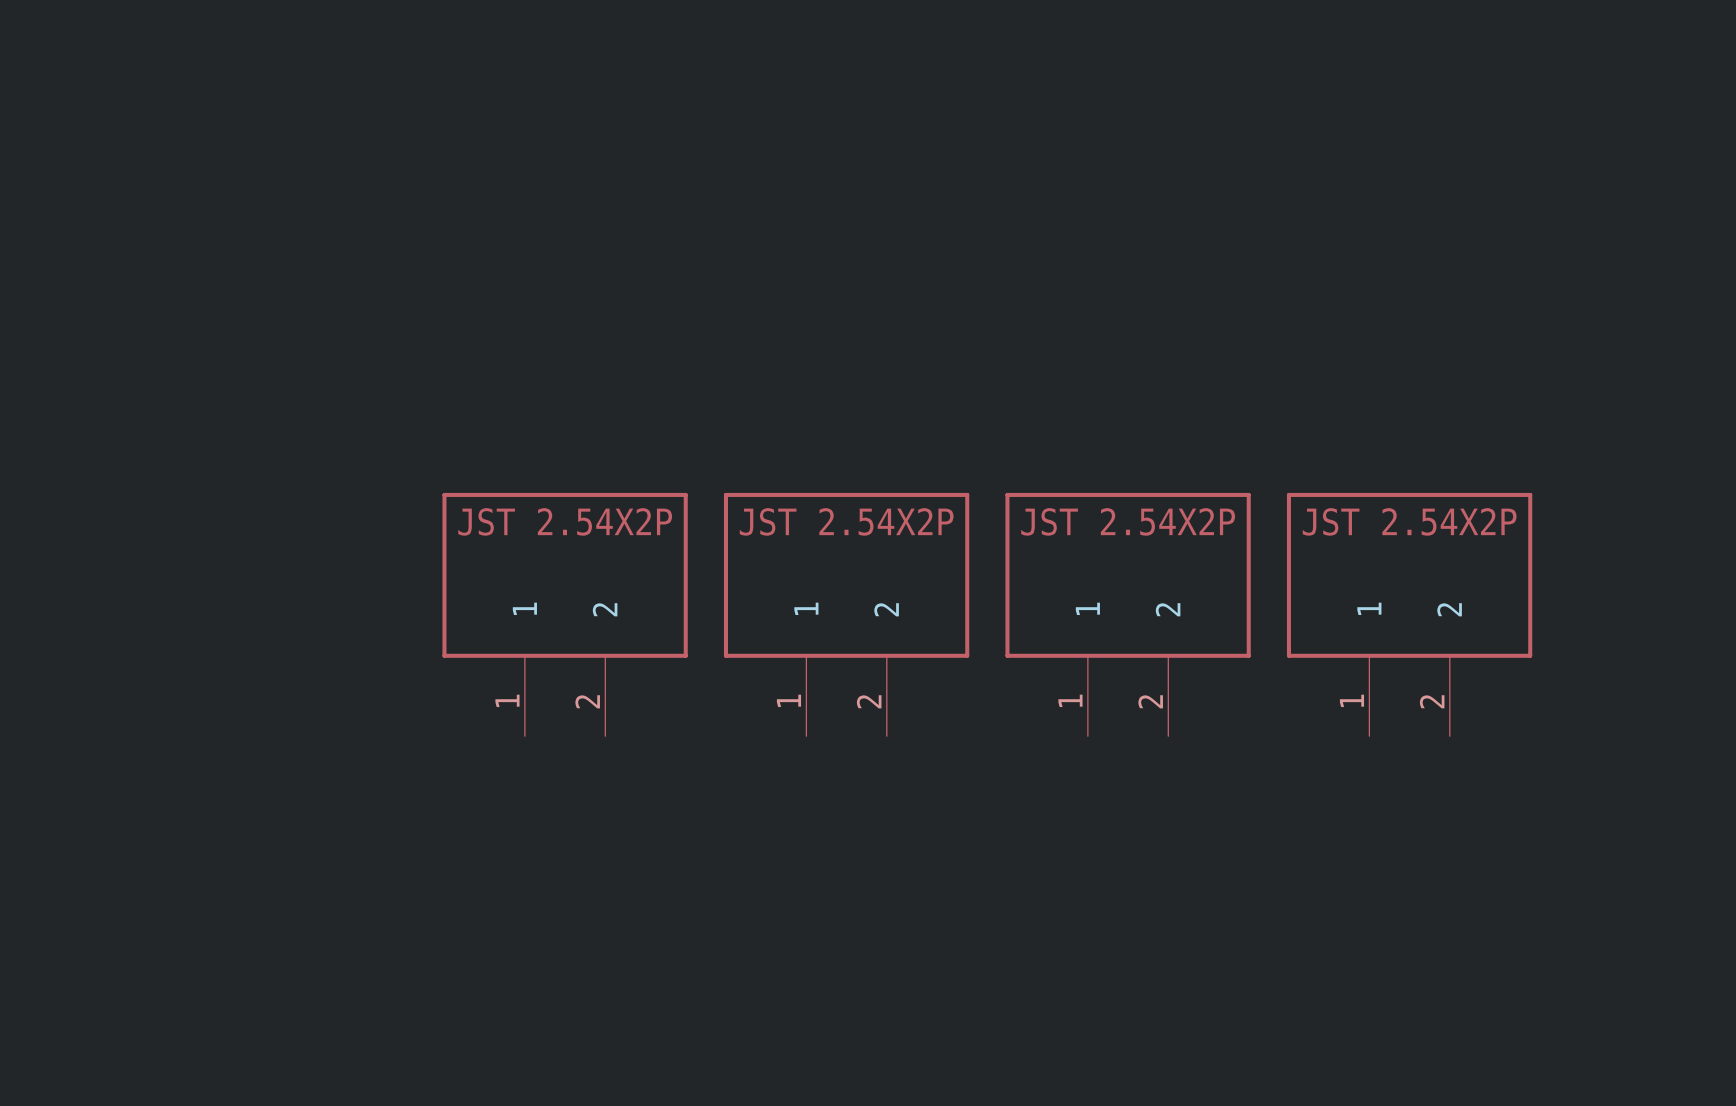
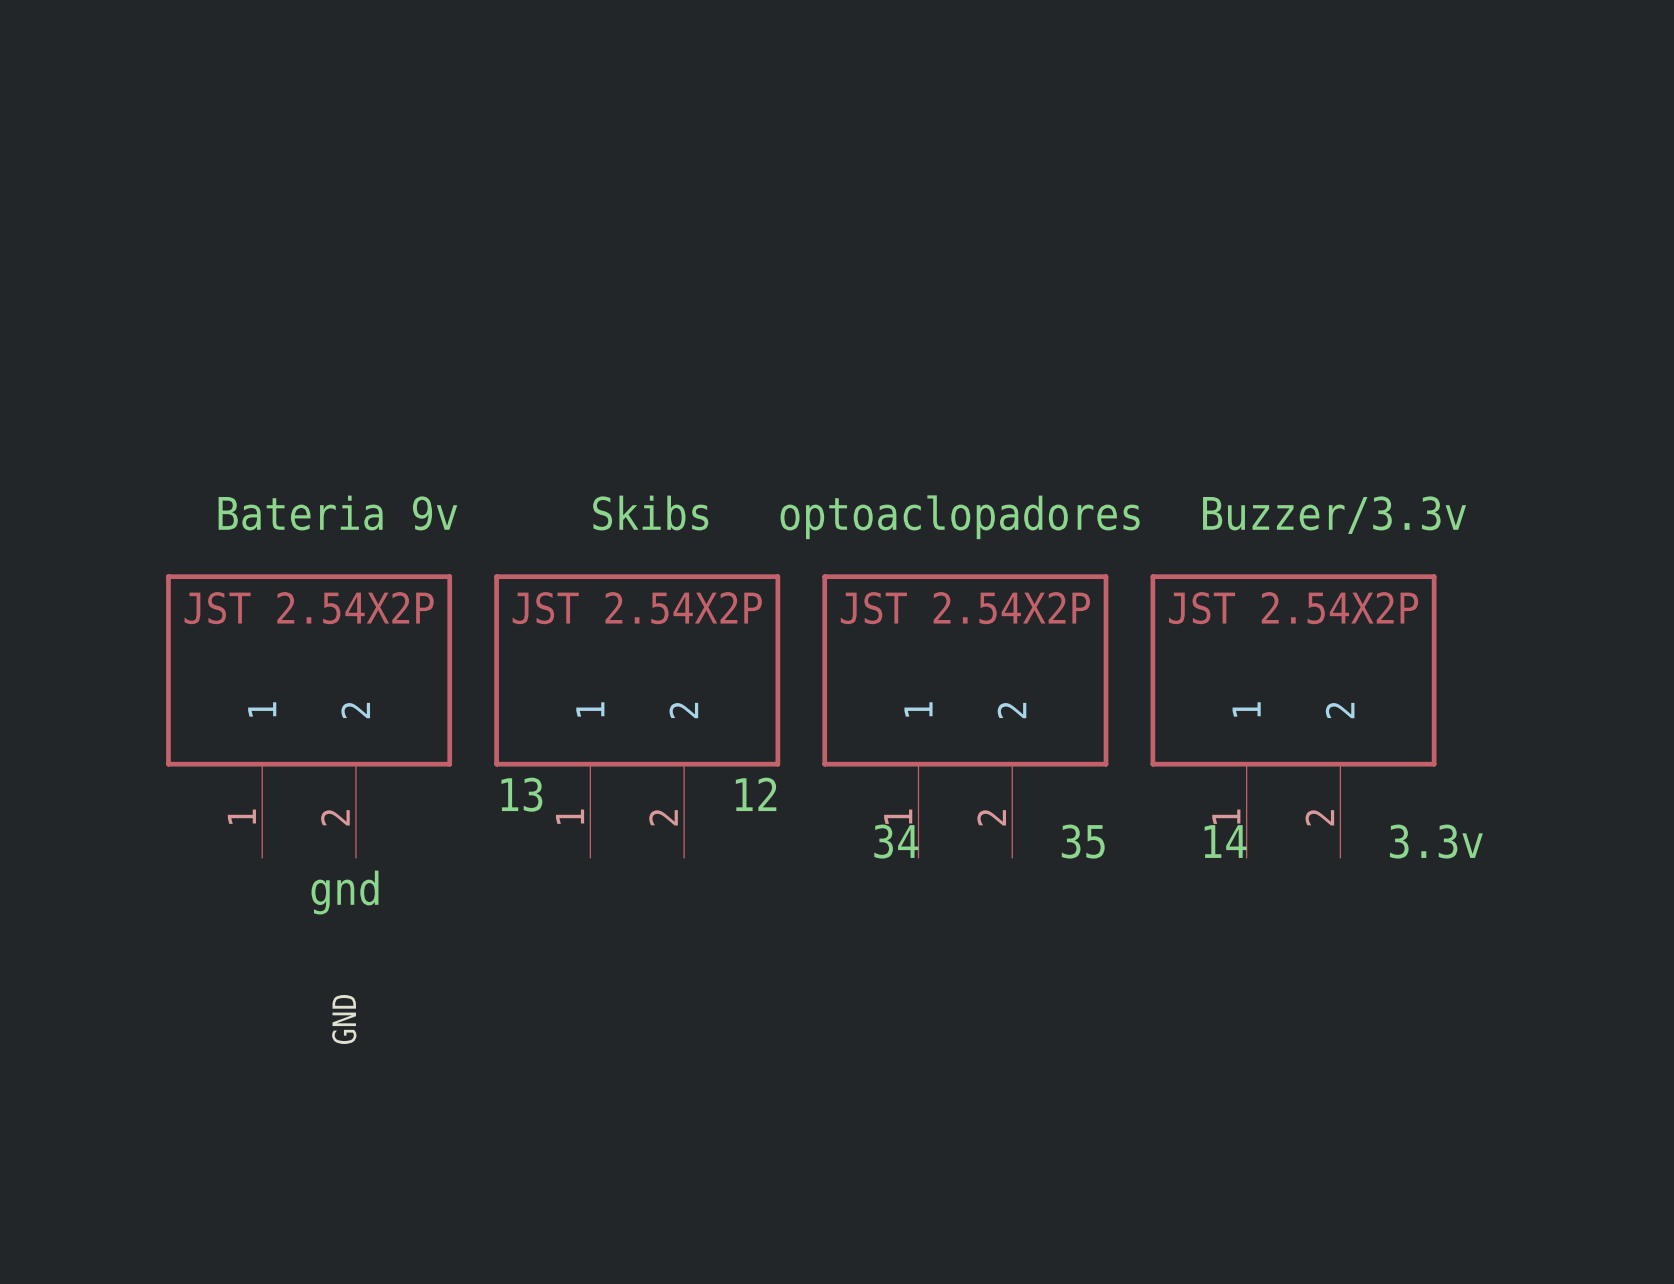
text: none -> Bateria 9v (337, 513)
text: none -> Skibs (650, 513)
text: none -> Buzzer/3.3v (1334, 515)
text: none -> optoaclopadores (960, 517)
text: none -> 13 (521, 794)
text: none -> 12 (756, 794)
text: none -> 34 (896, 841)
text: none -> 35 (1083, 841)
text: none -> 14 (1225, 841)
text: none -> 3.3v (1436, 841)
text: none -> gnd (344, 892)
label: none -> GND (344, 1019)

